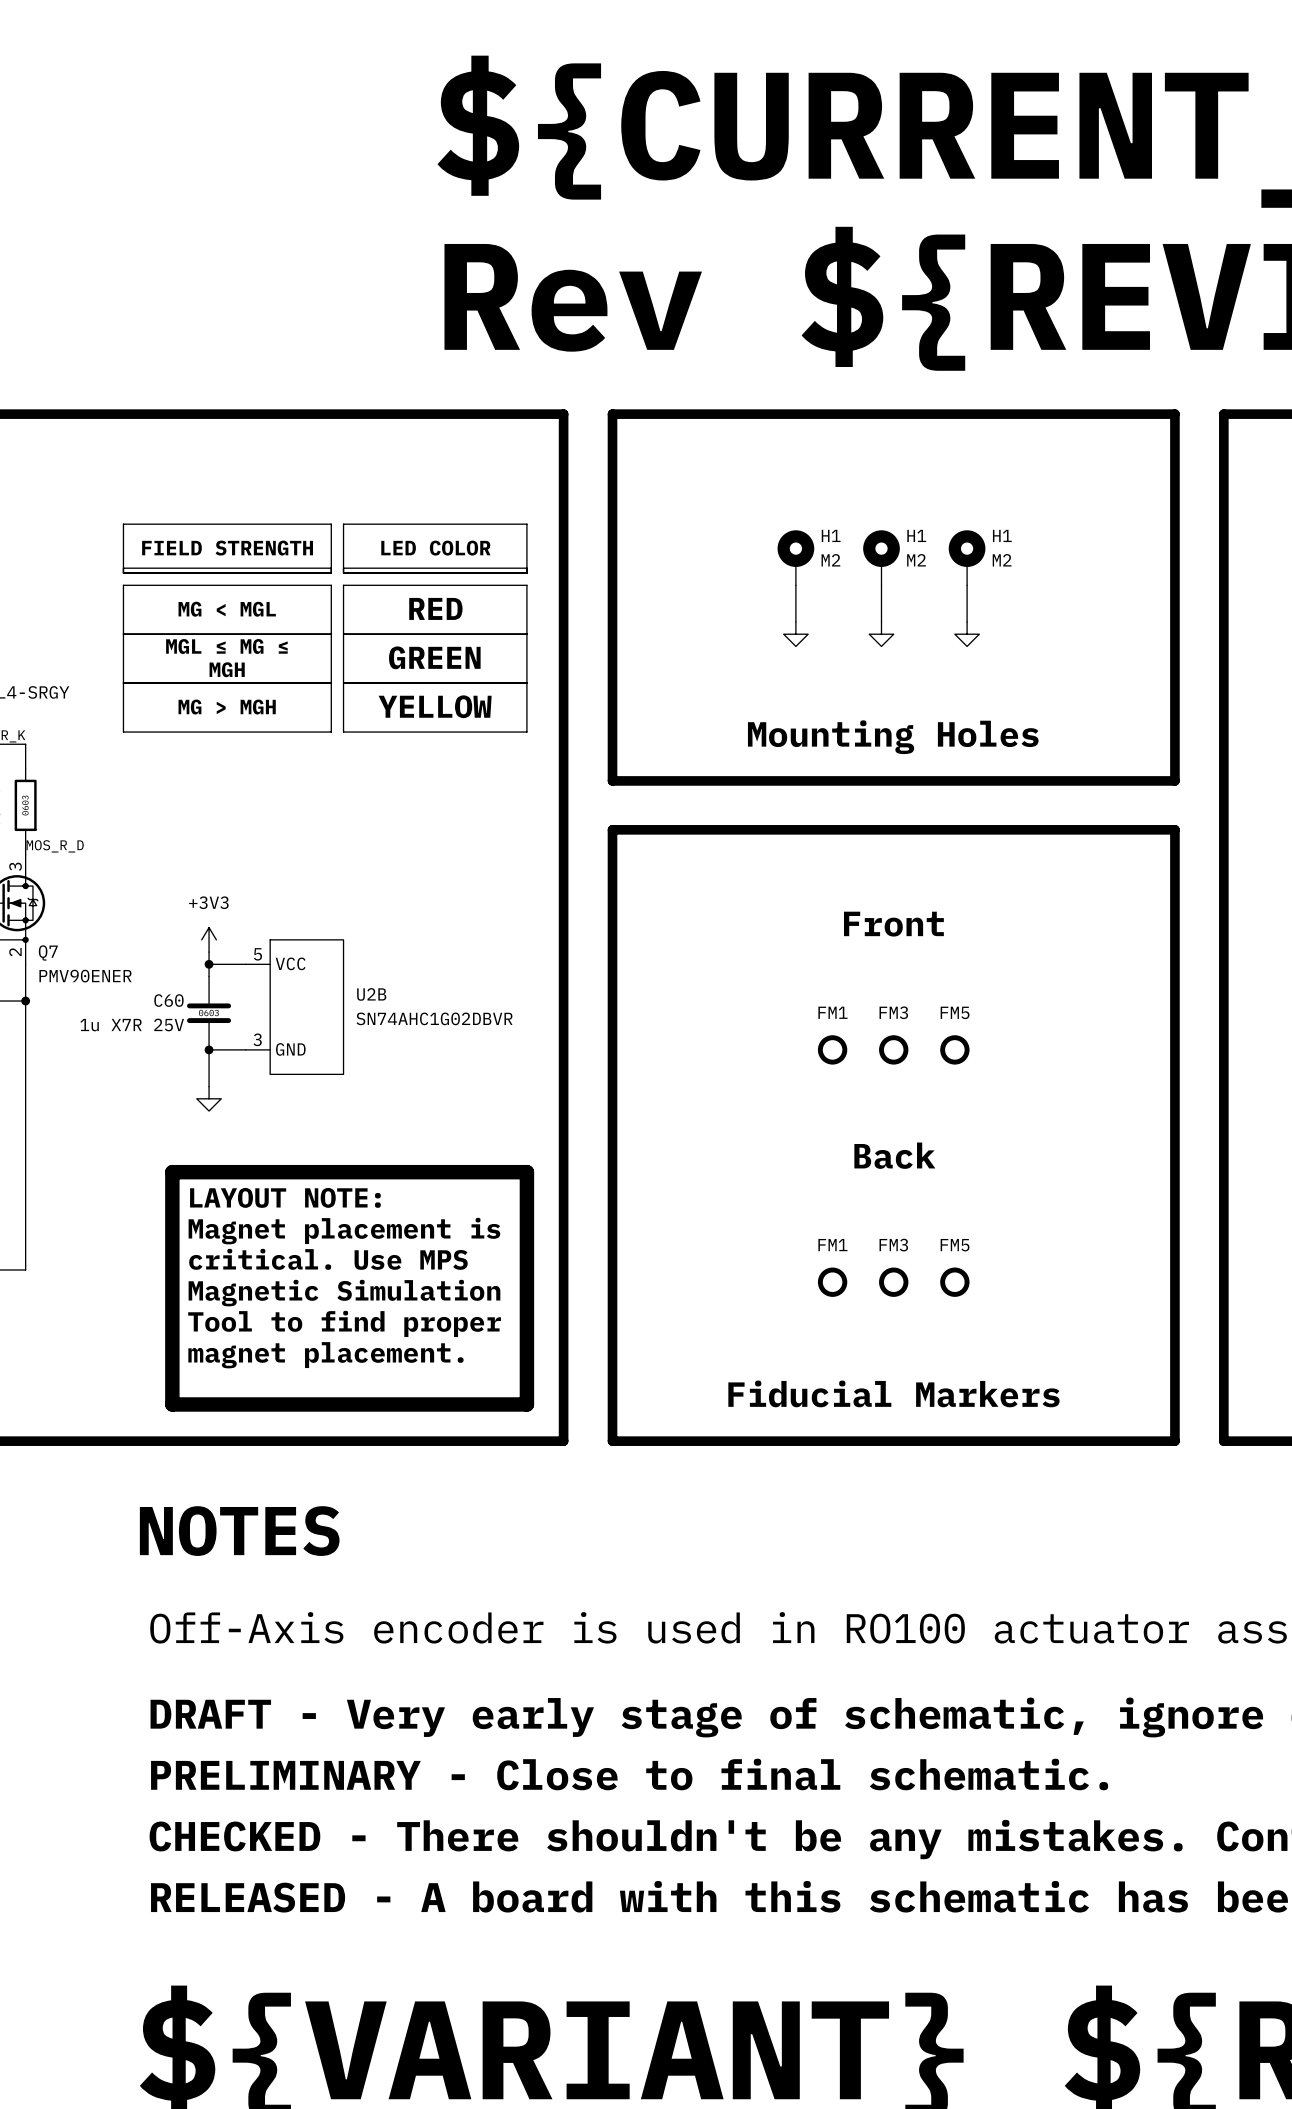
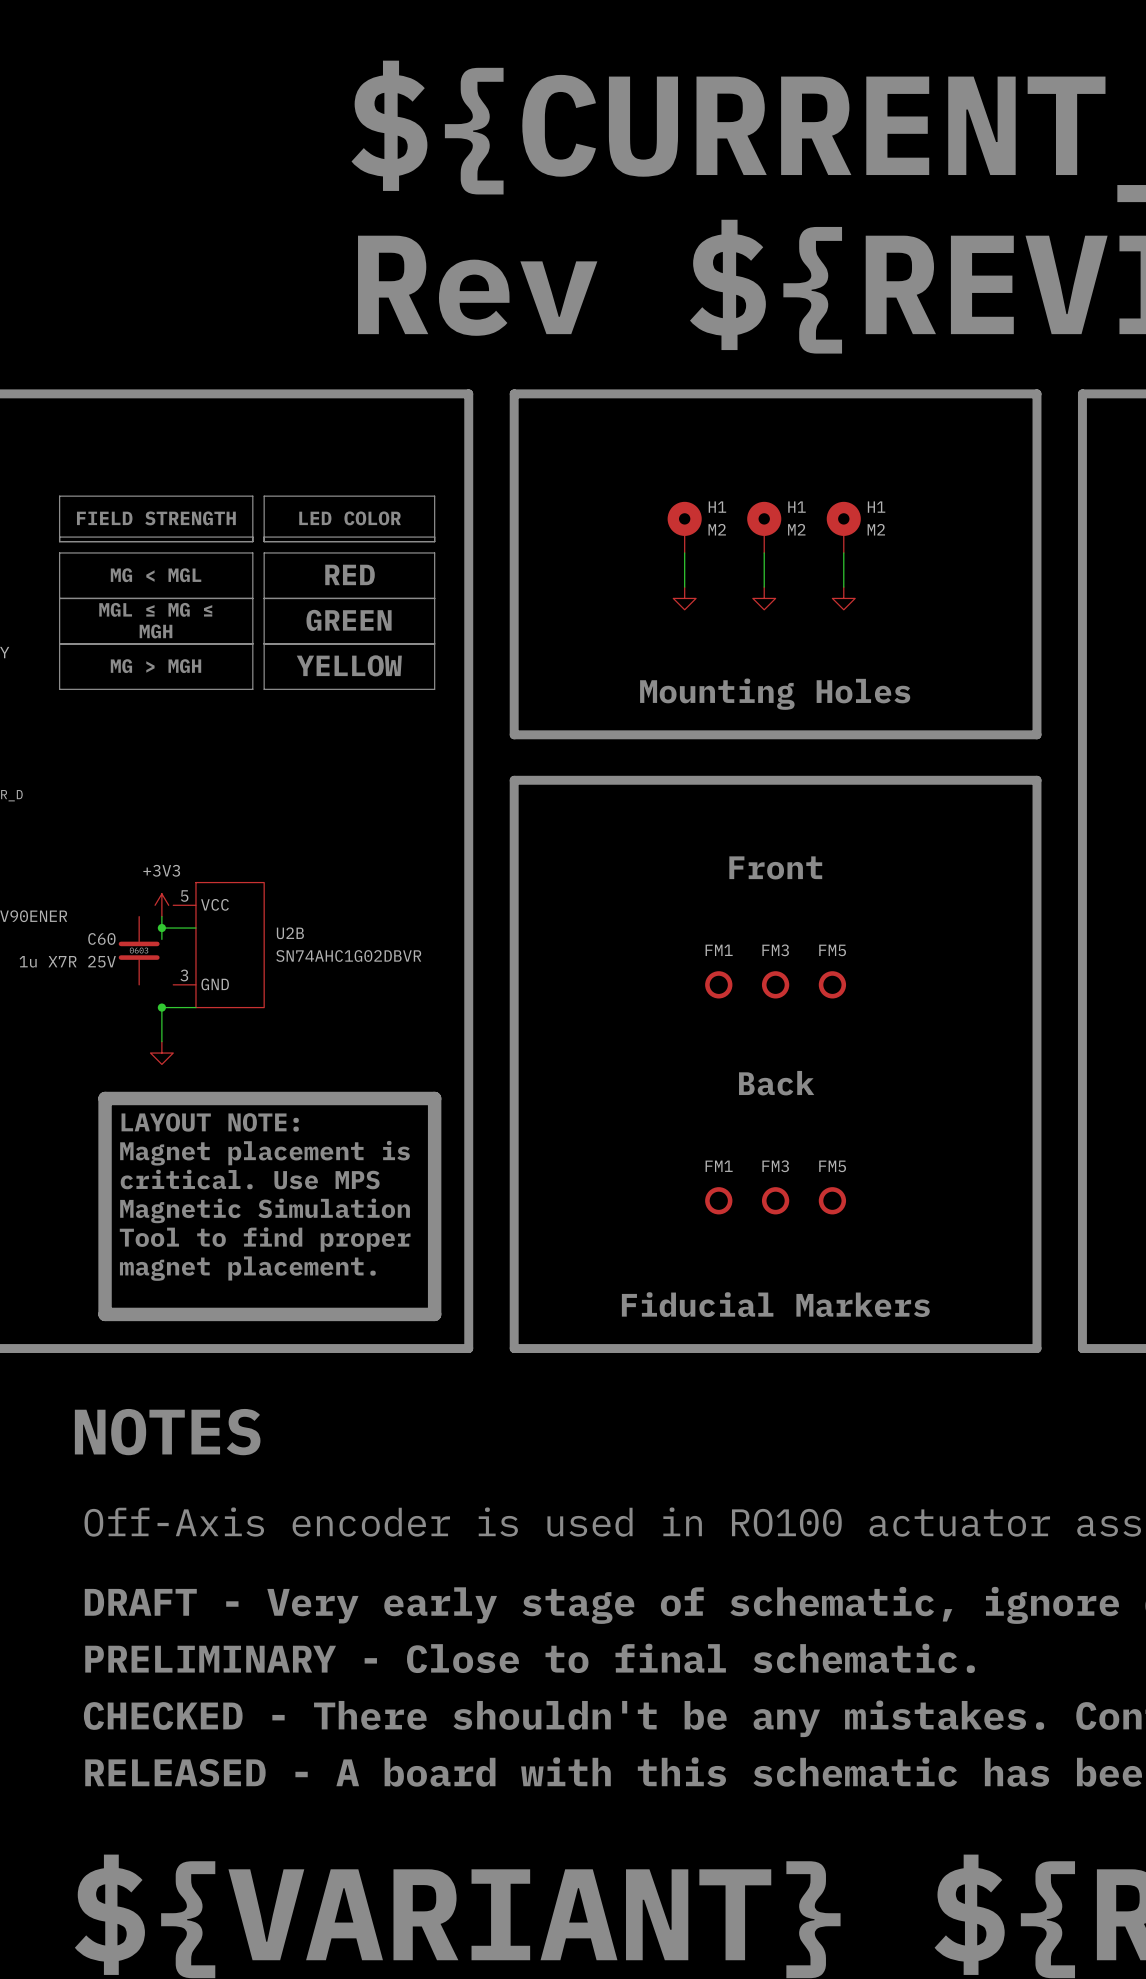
power symbol position: +3V3 (209, 939) -> +3V3 (161, 905)
wire: (209, 952) (209, 976) -> (161, 916) (161, 939)
wire: (209, 964) (245, 964) -> (161, 928) (195, 928)
junction: (209, 964) -> none
junction: none -> (161, 928)
junction: (209, 1049) -> none
wire: (245, 1049) (209, 1049) (209, 1086) -> (195, 1007) (161, 1007) (161, 1041)
junction: none -> (161, 1007)
power symbol position: (209, 1098) -> (161, 1053)

